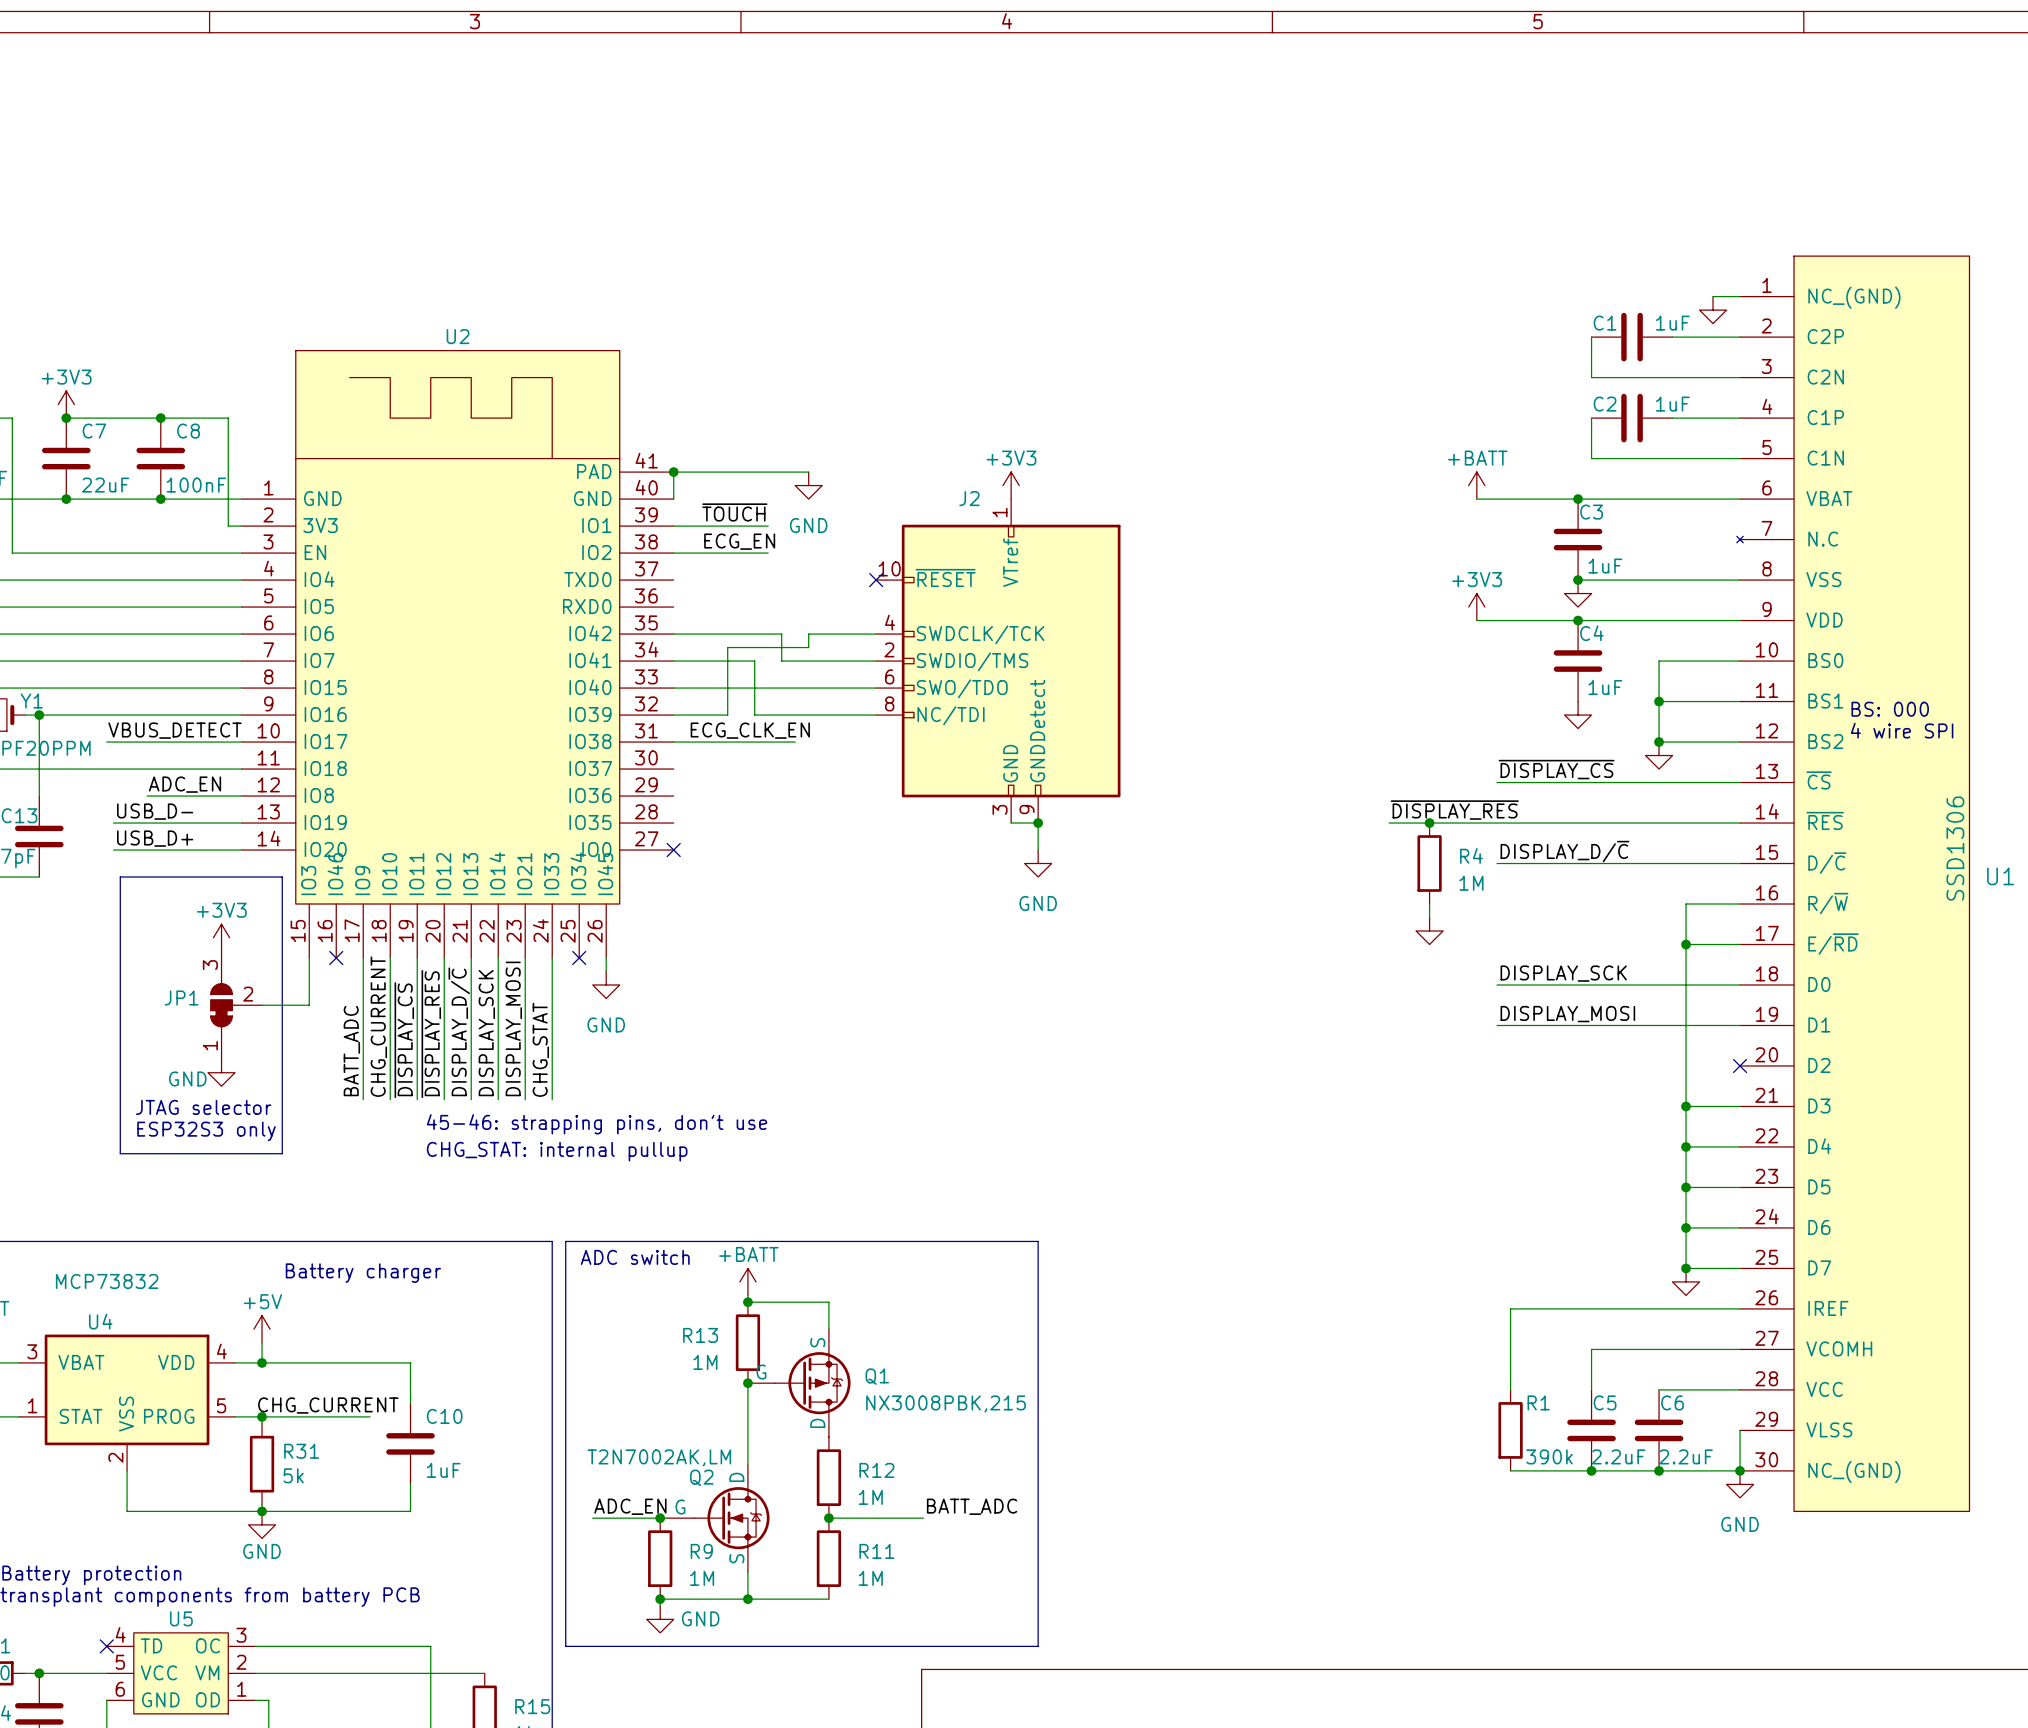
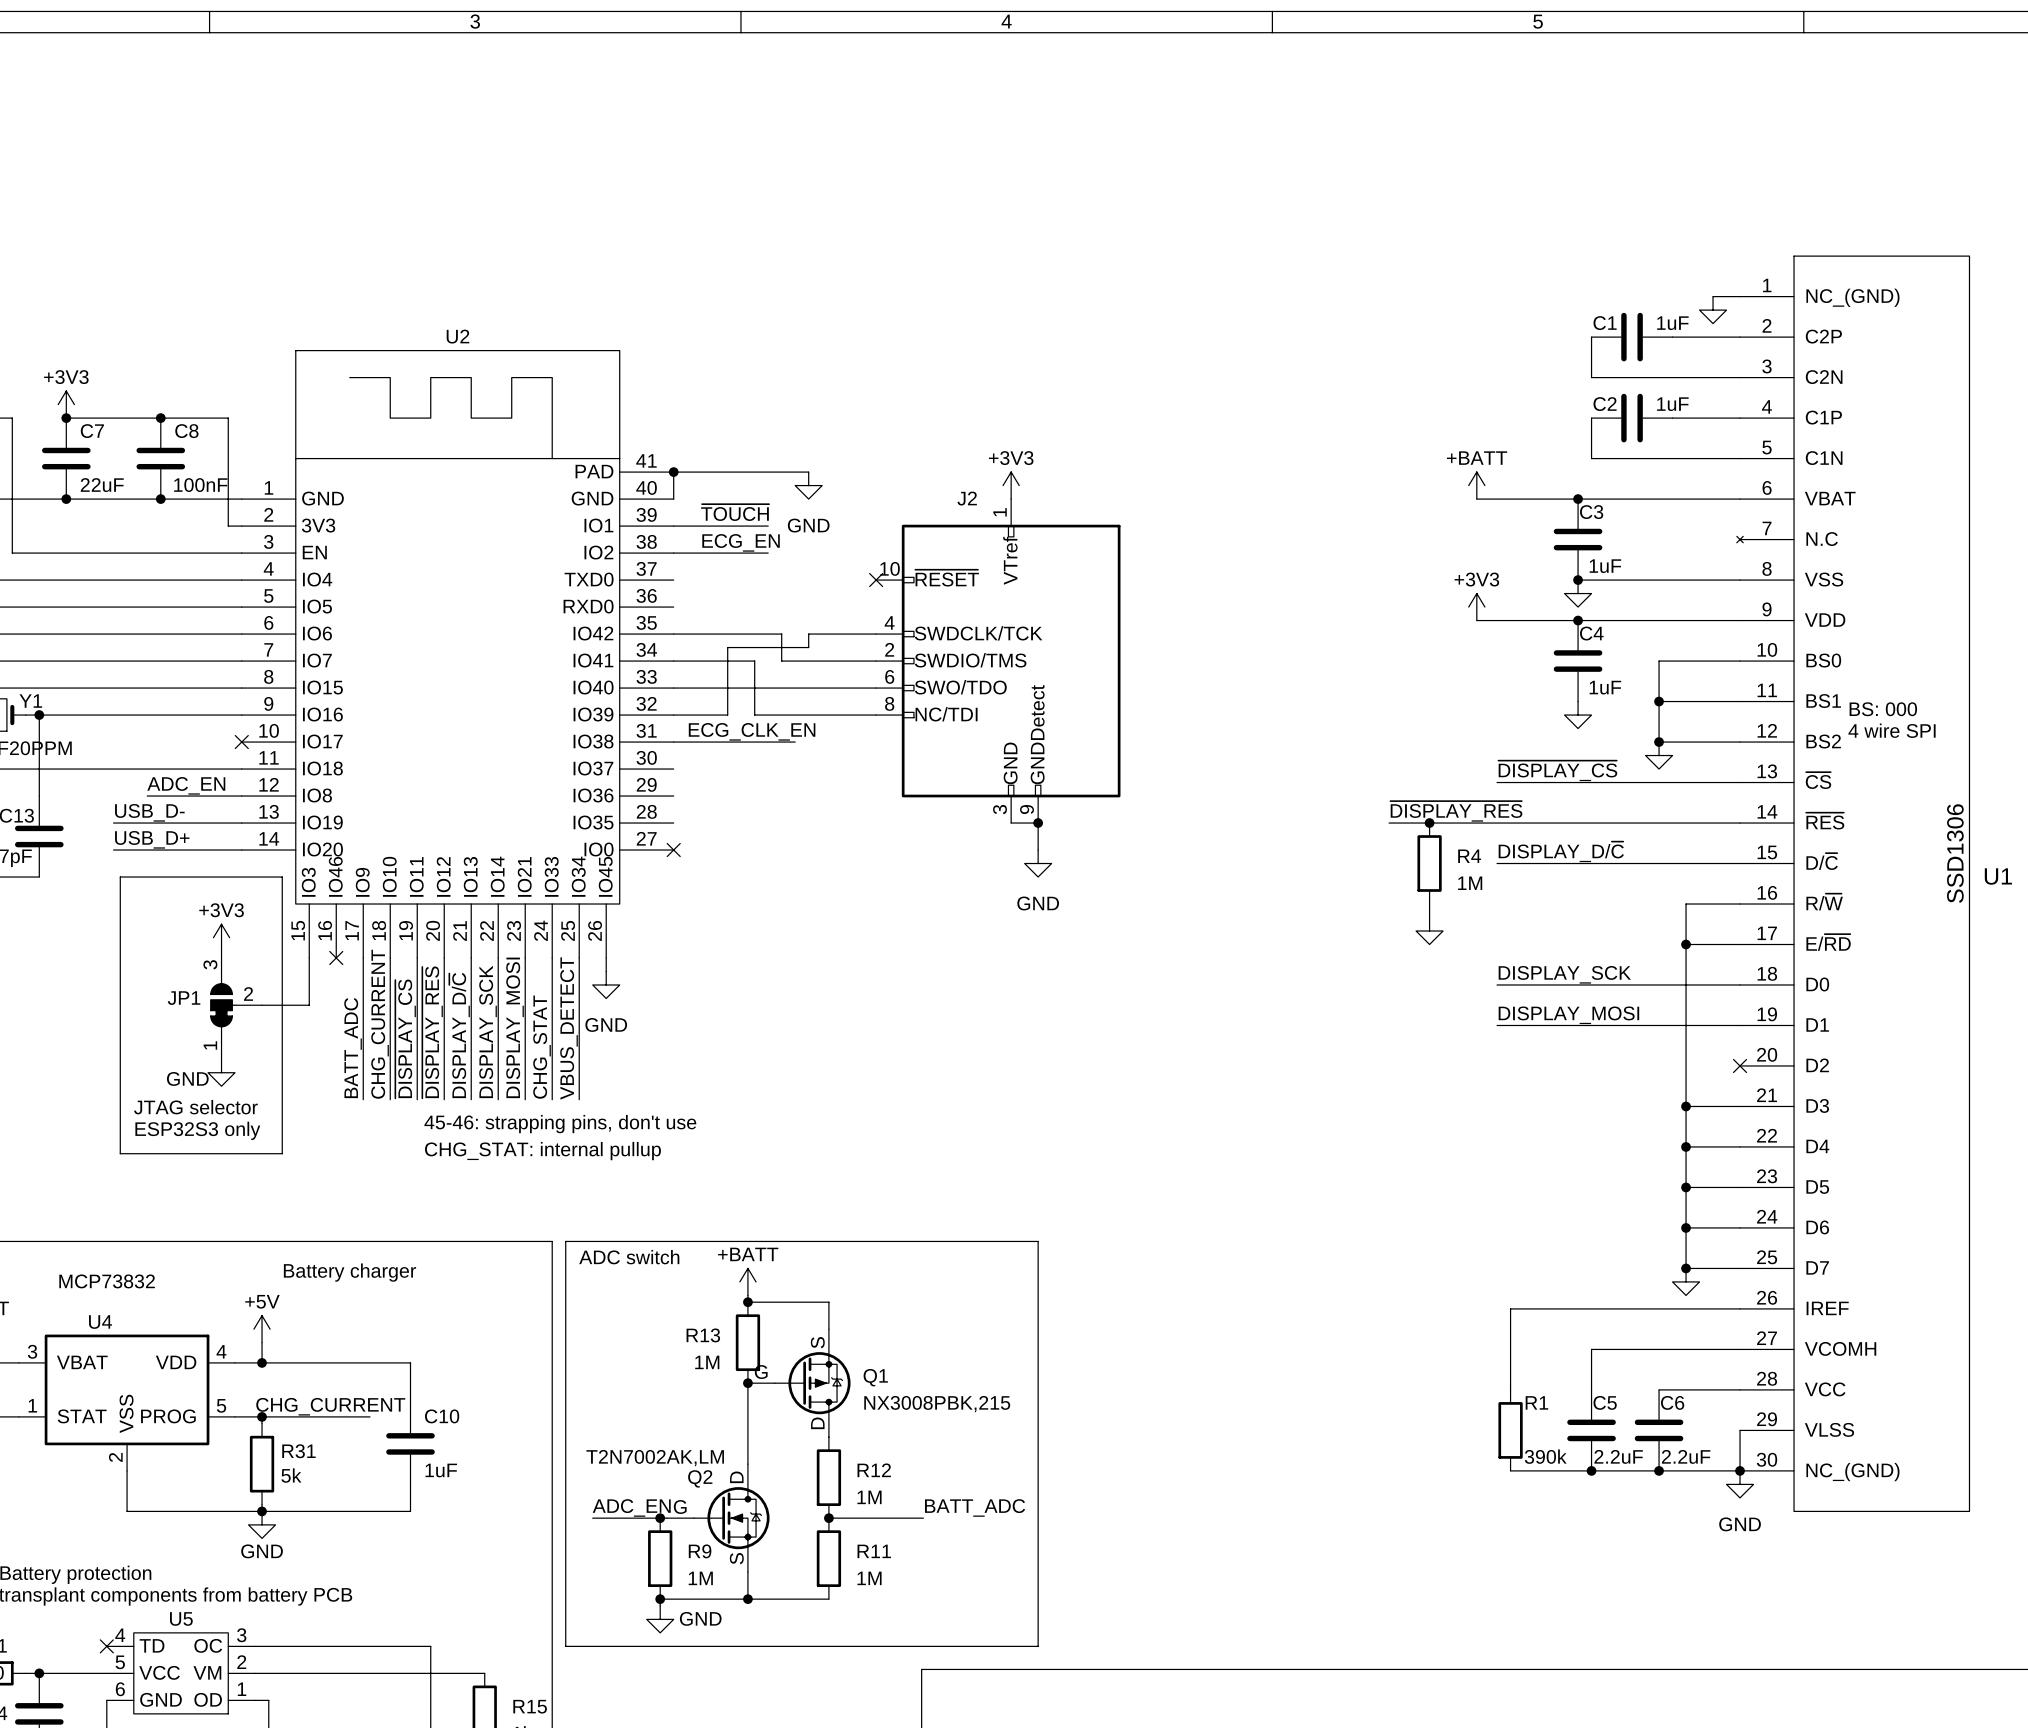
label: VBUS_DETECT (175, 730) -> none
wire: (106, 742) (241, 742) -> none
no-connect mark: none -> (241, 742)
wire: none -> (579, 957) (579, 1099)
no-connect mark: (579, 957) -> none
label: none -> VBUS_DETECT (569, 1028)

